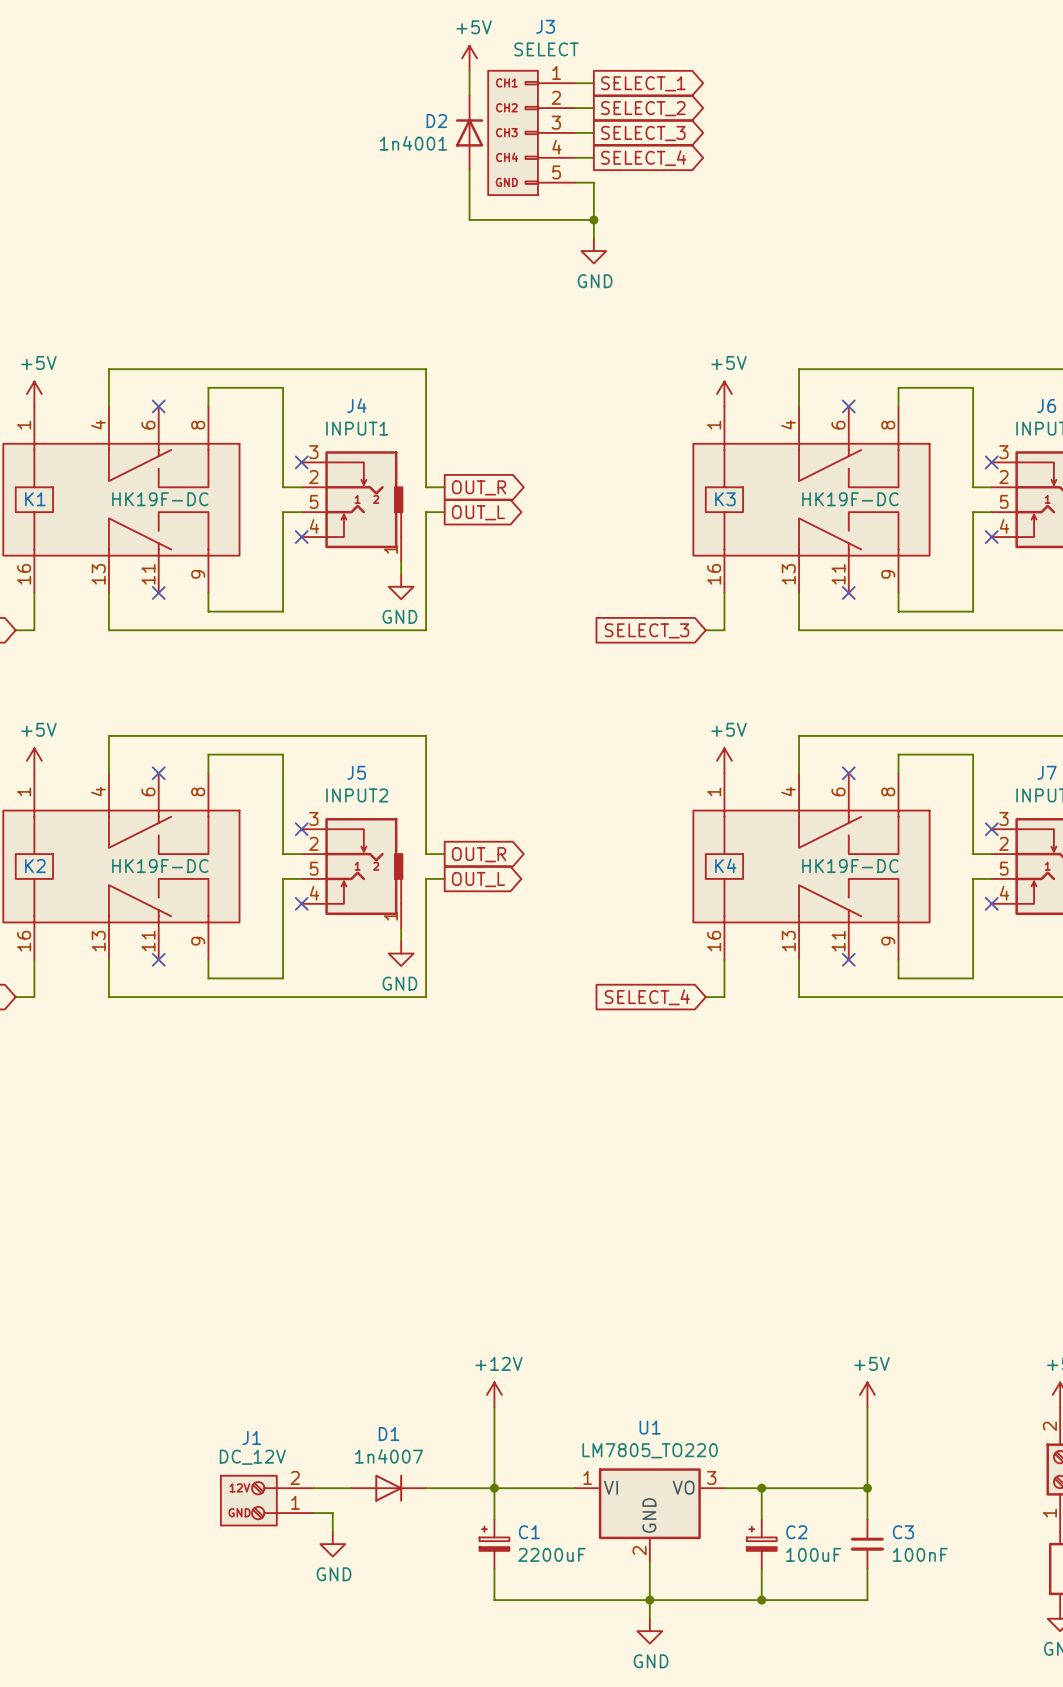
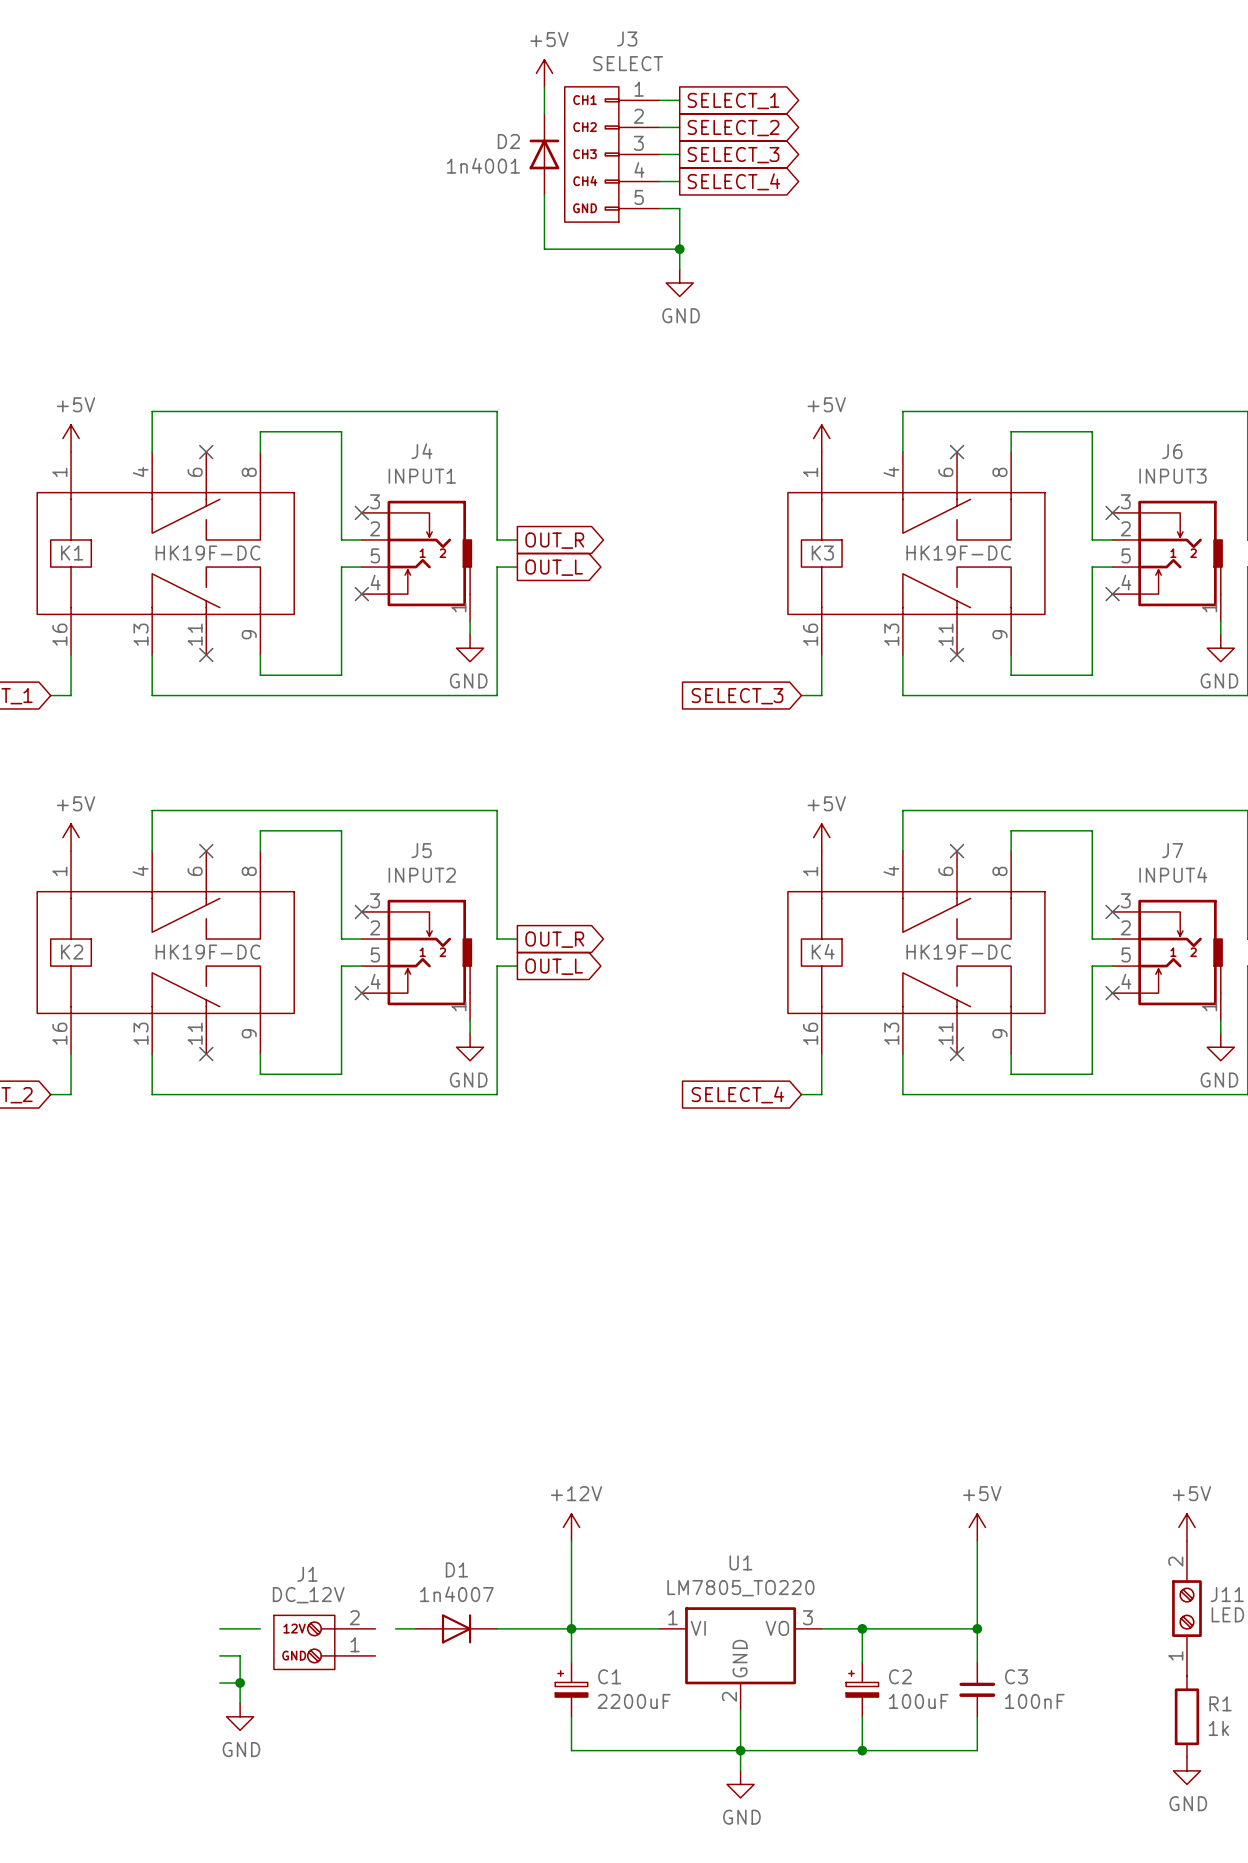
wire: none -> (219, 1628) (260, 1628)
wire: (314, 1488) (332, 1488) -> (219, 1682) (240, 1682)
wire: none -> (219, 1655) (240, 1655) (240, 1703)
wire: (314, 1513) (332, 1513) (332, 1531) -> none
junction: none -> (240, 1682)
power symbol position: GND (332, 1544) -> GND (240, 1716)

